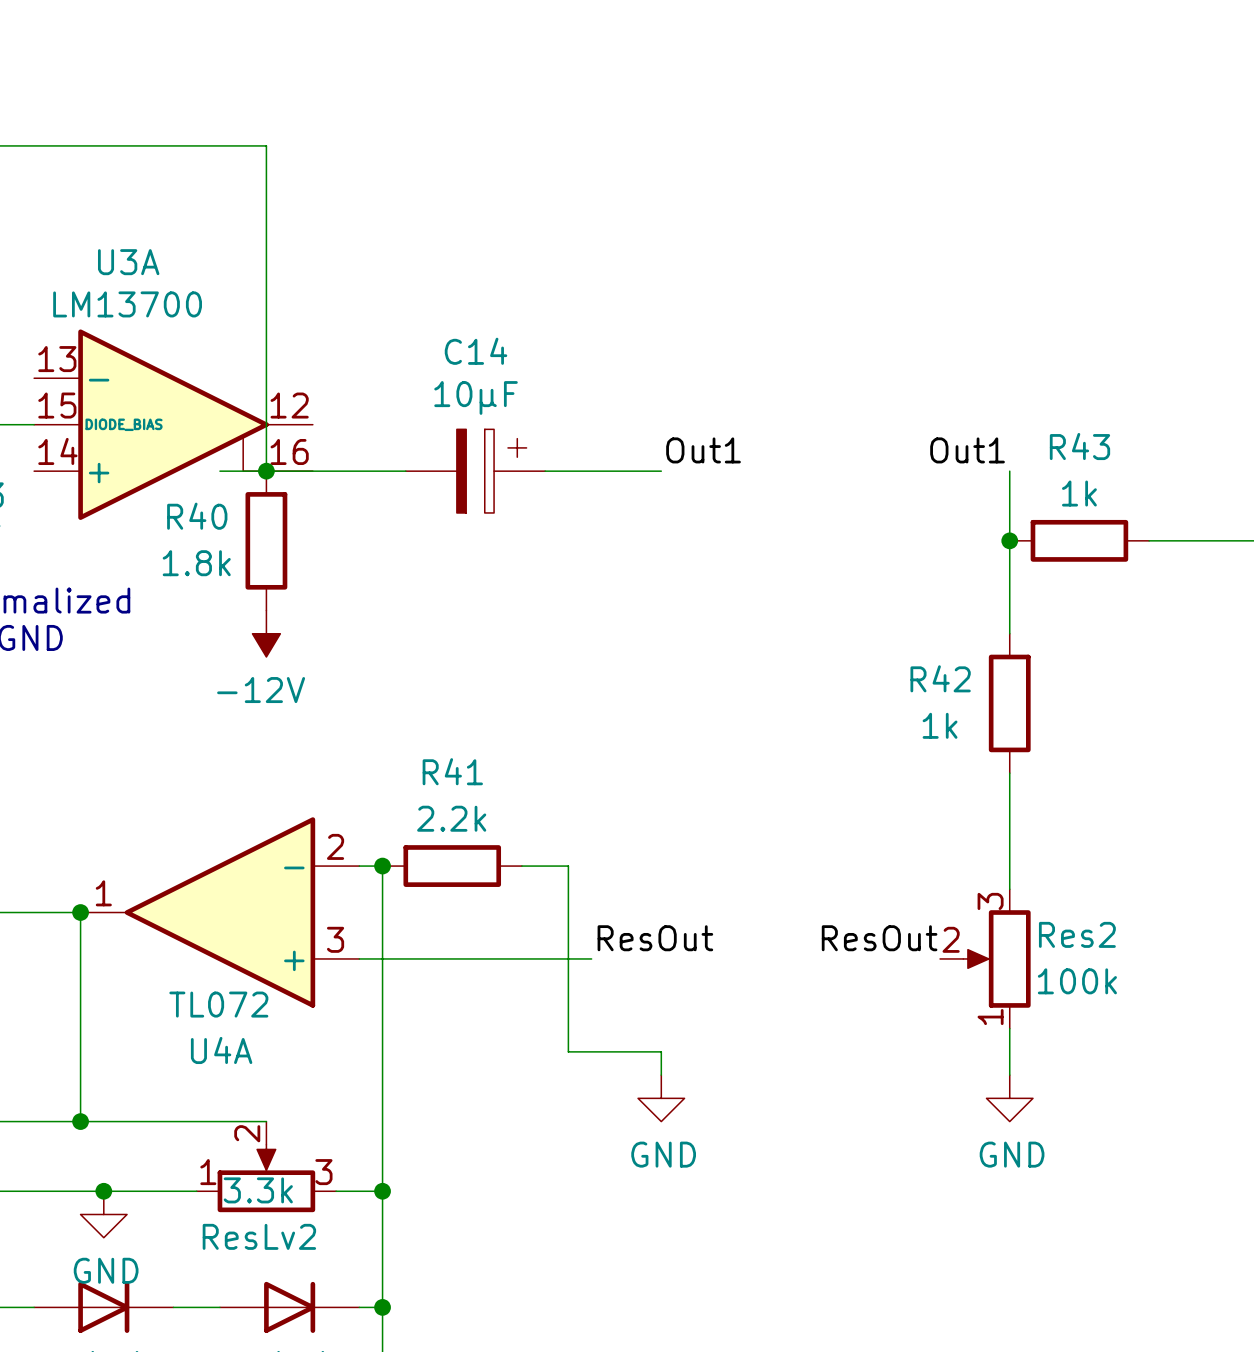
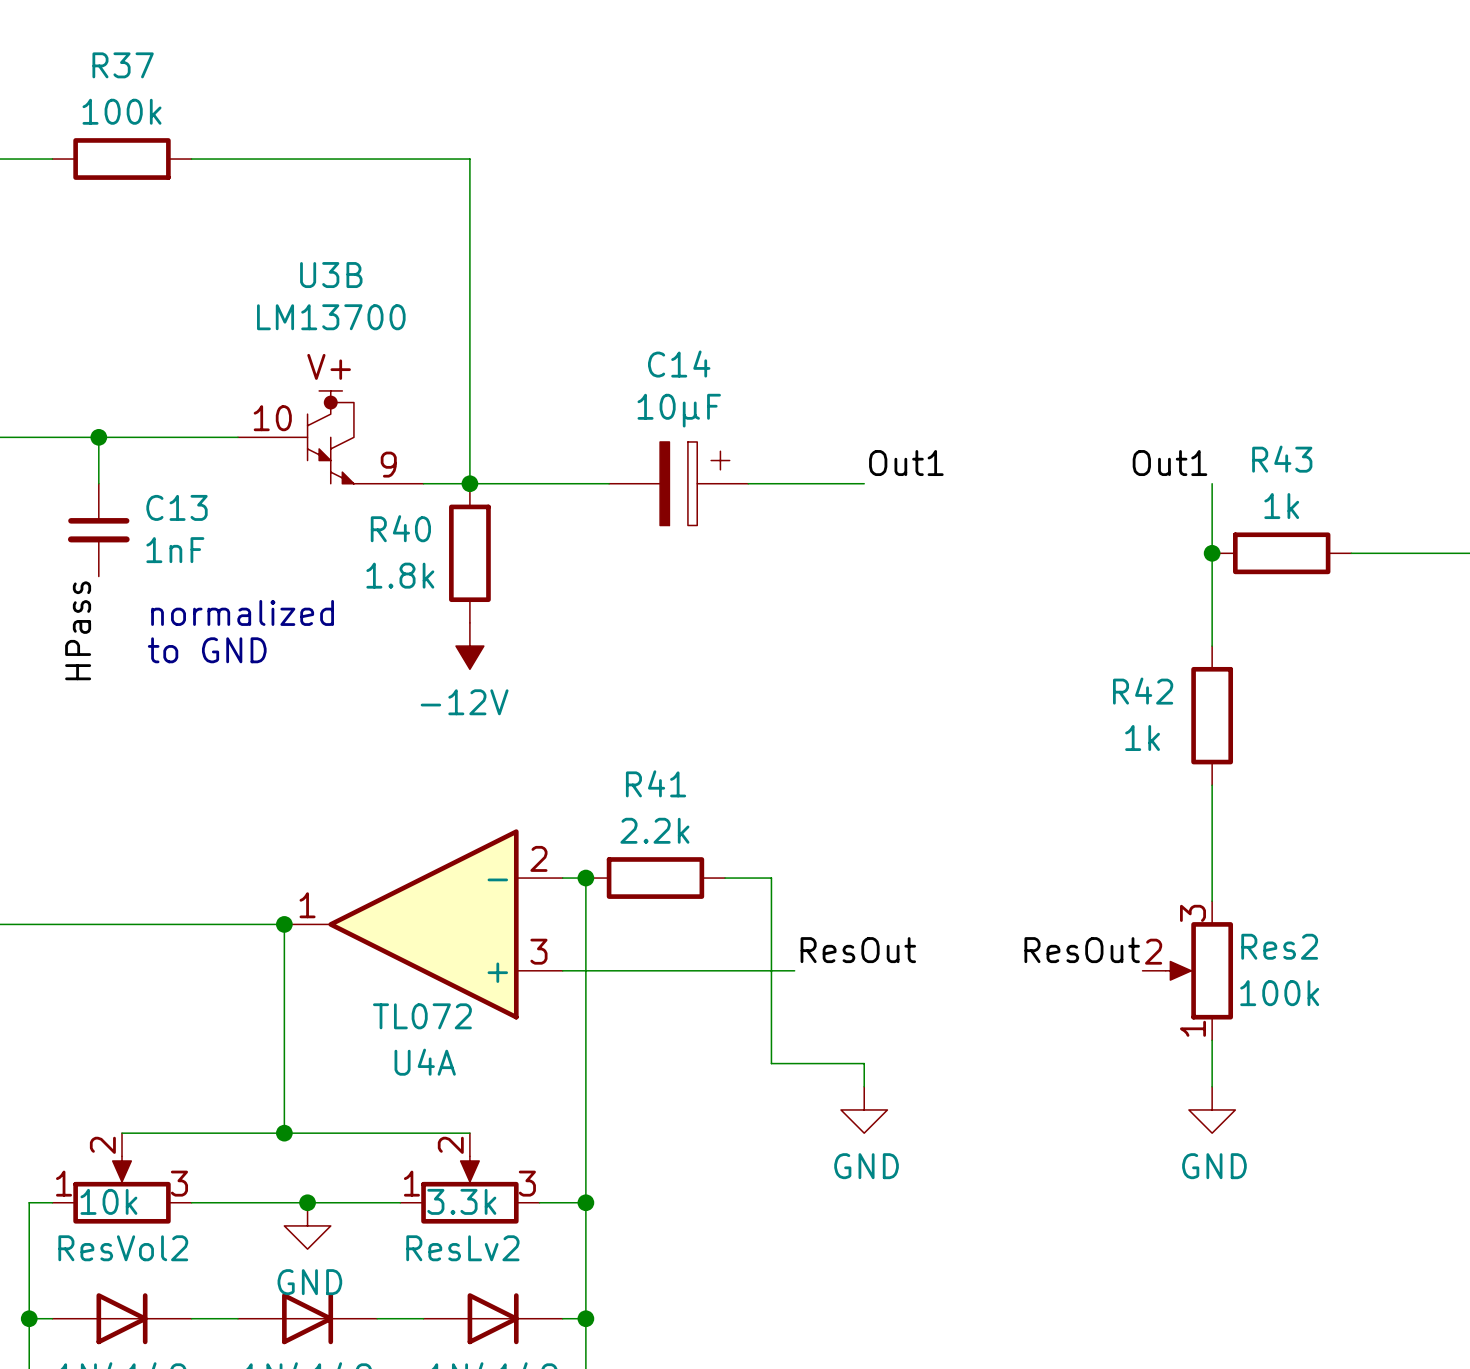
U3B: none -> LM13700 (330, 437)
U3A: LM13700 (173, 424) -> none

